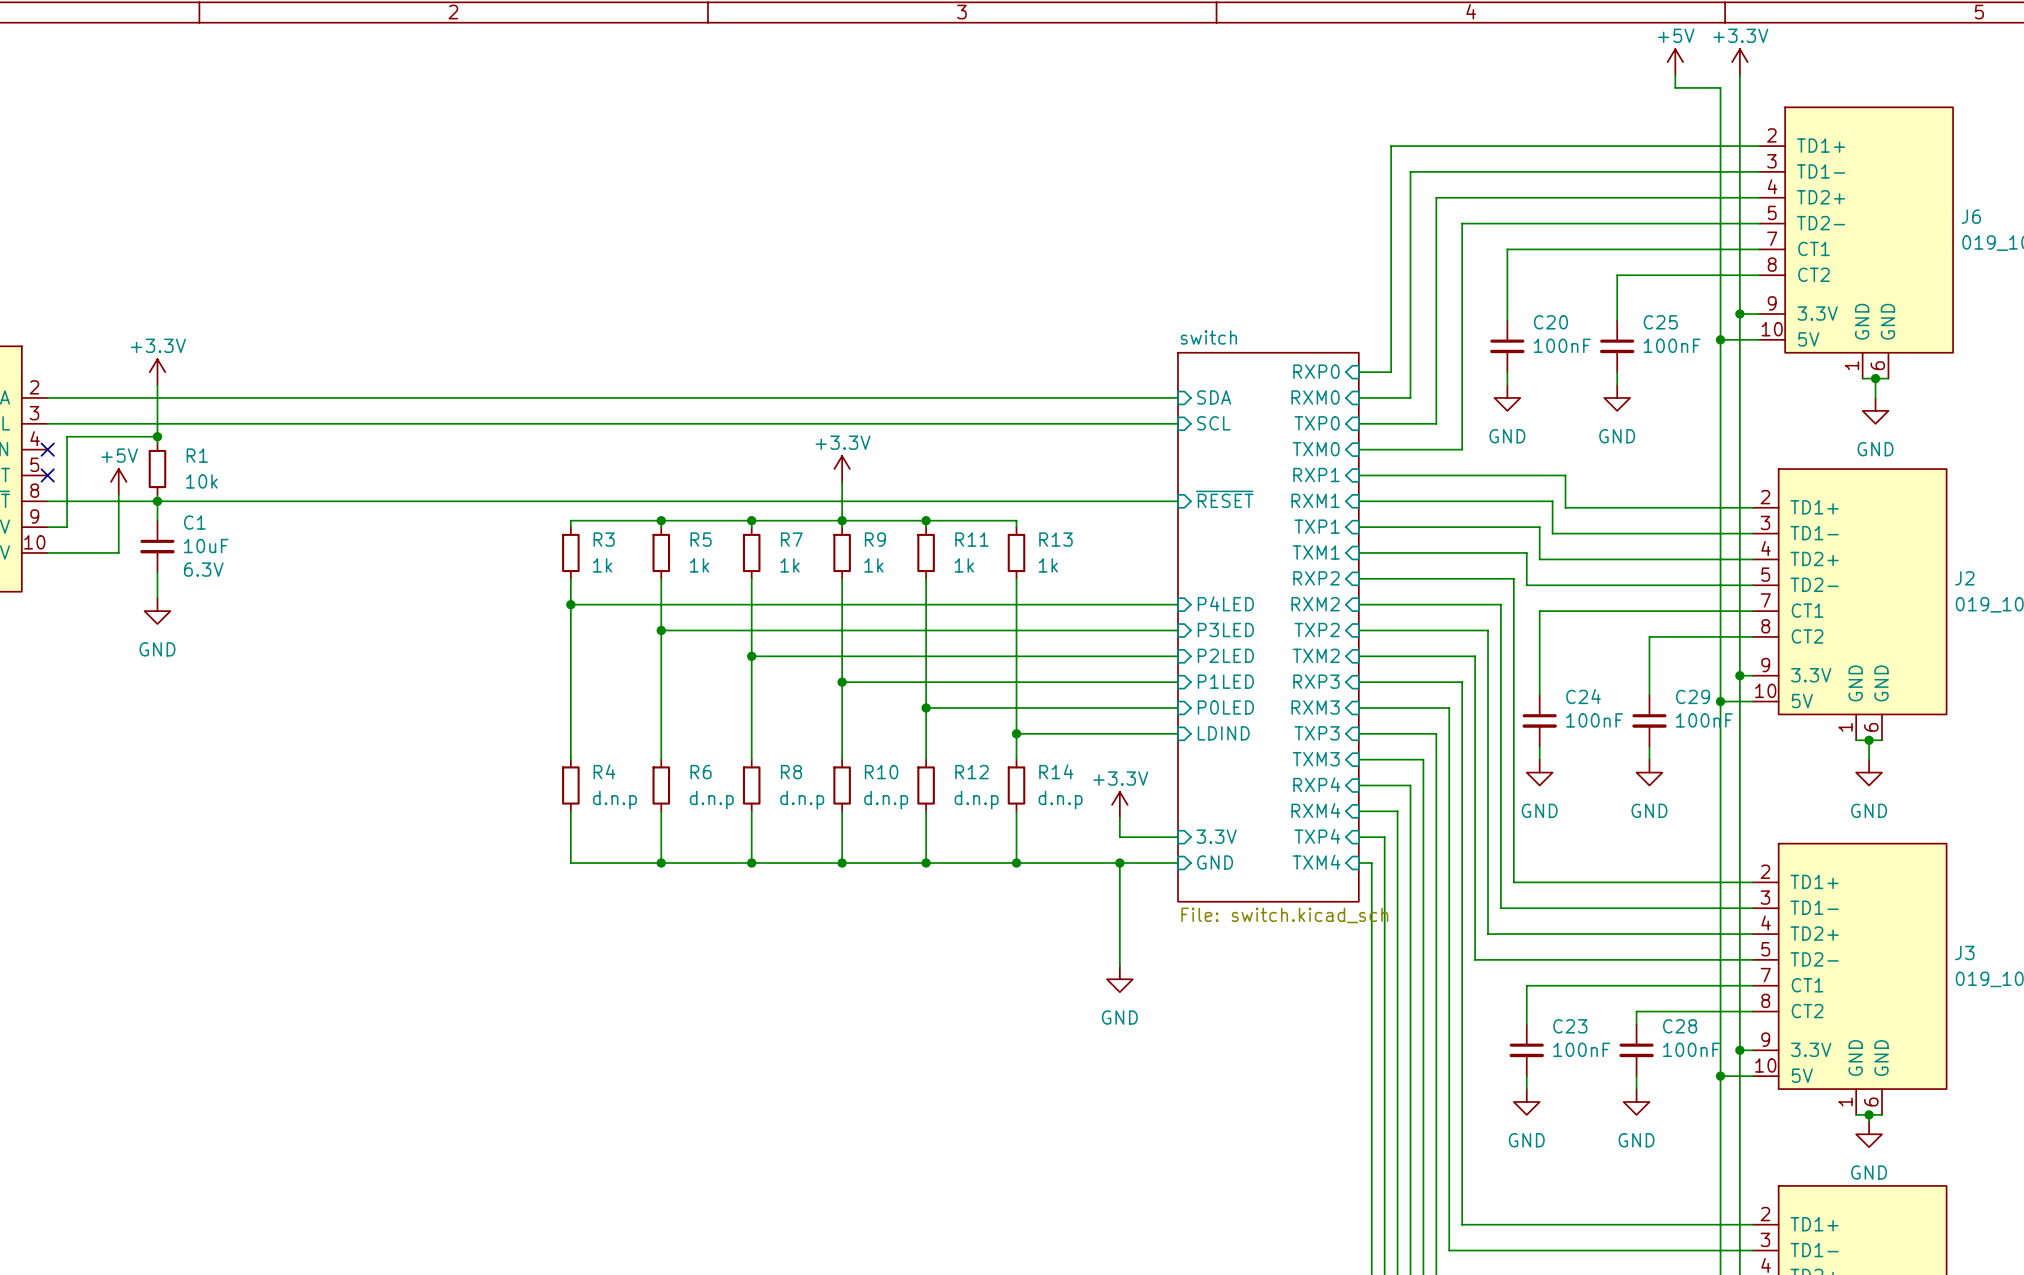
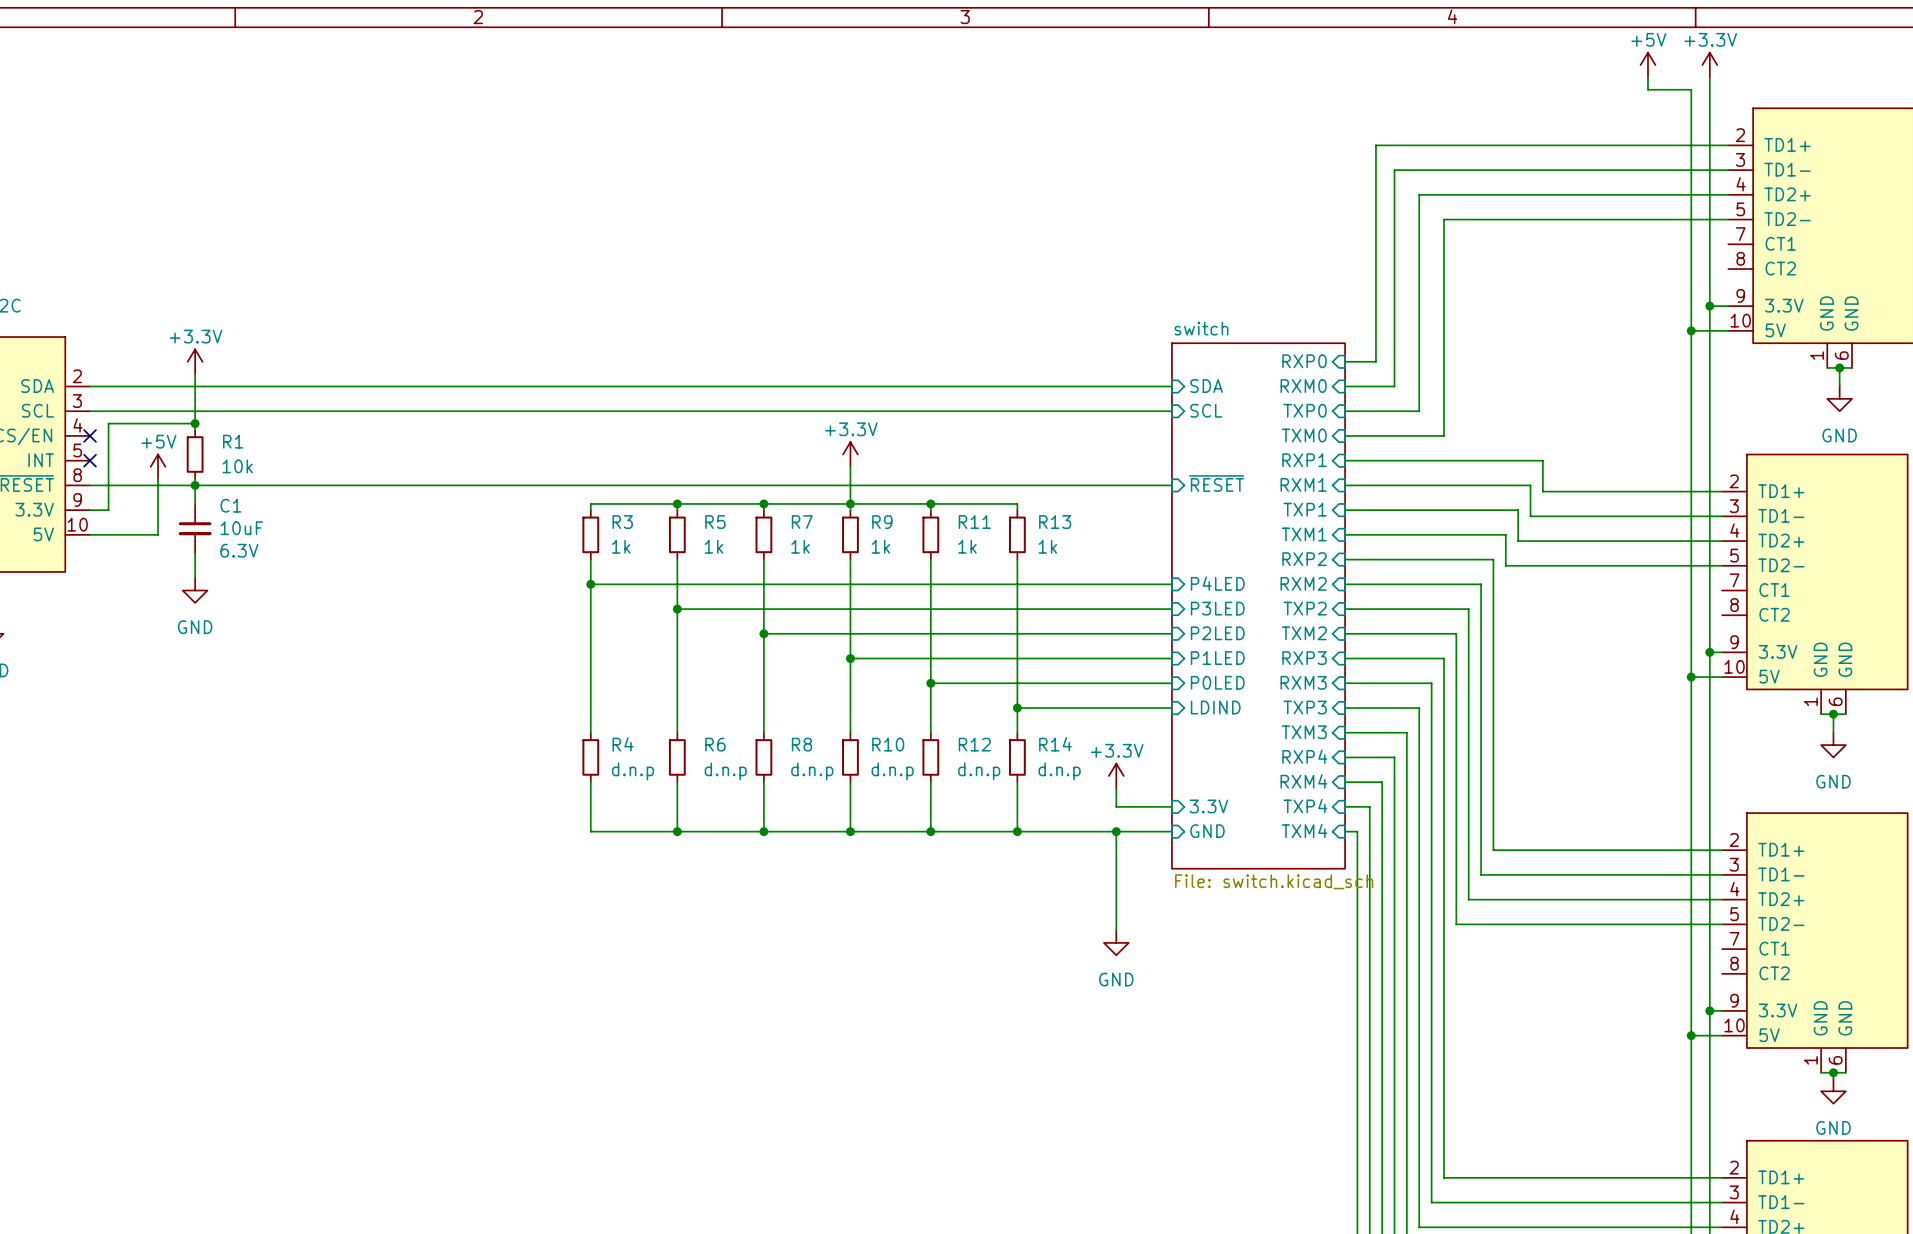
wire: (1759, 249) (1507, 249) (1507, 320) -> none
wire: (1759, 275) (1617, 275) (1617, 320) -> none
C20: 100nF (1507, 346) -> none
C25: 100nF (1617, 346) -> none
wire: (1507, 372) (1507, 385) -> none
wire: (1617, 372) (1617, 385) -> none
power symbol: GND (1507, 397) -> none
power symbol: GND (1617, 397) -> none
wire: (1752, 611) (1539, 611) (1539, 695) -> none
wire: (1752, 636) (1649, 636) (1649, 695) -> none
C24: 100nF (1539, 720) -> none
C29: 100nF (1649, 720) -> none
wire: (1539, 746) (1539, 759) -> none
wire: (1649, 746) (1649, 759) -> none
power symbol: GND (1539, 772) -> none
power symbol: GND (1649, 772) -> none
wire: (1752, 985) (1526, 985) (1526, 1024) -> none
wire: (1752, 1011) (1636, 1011) (1636, 1024) -> none
C23: 100nF (1526, 1050) -> none
C28: 100nF (1636, 1050) -> none
wire: (1526, 1076) (1526, 1089) -> none
wire: (1636, 1076) (1636, 1089) -> none
power symbol: GND (1526, 1101) -> none
power symbol: GND (1636, 1101) -> none

